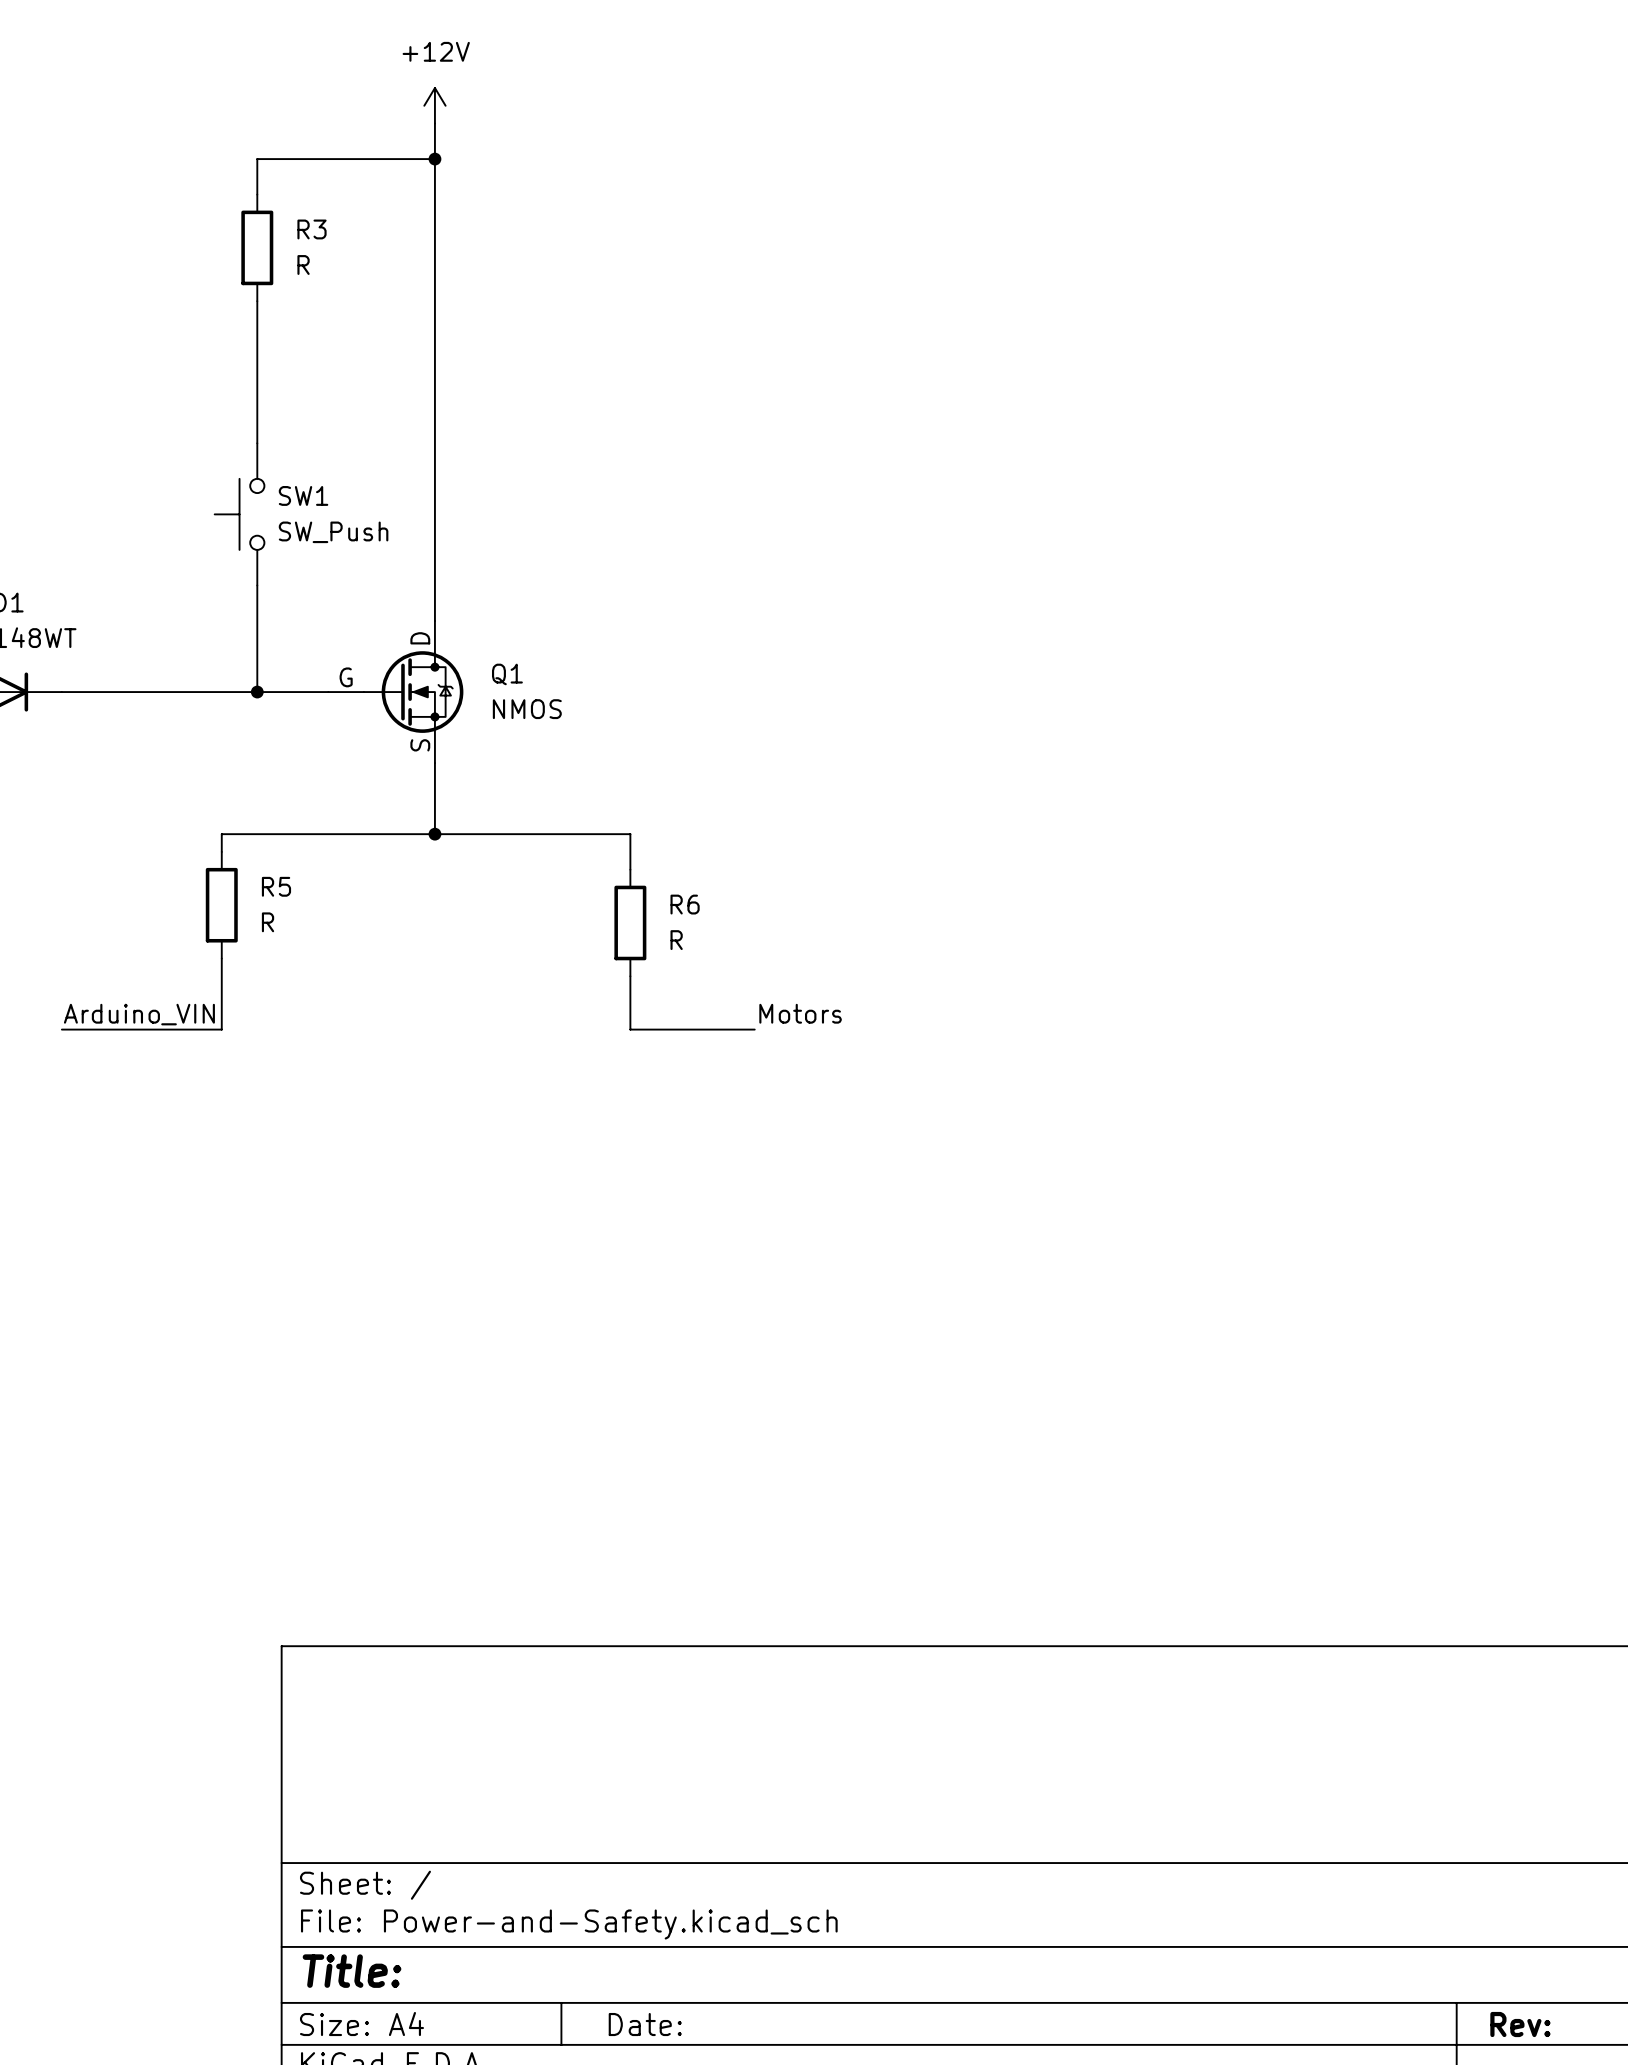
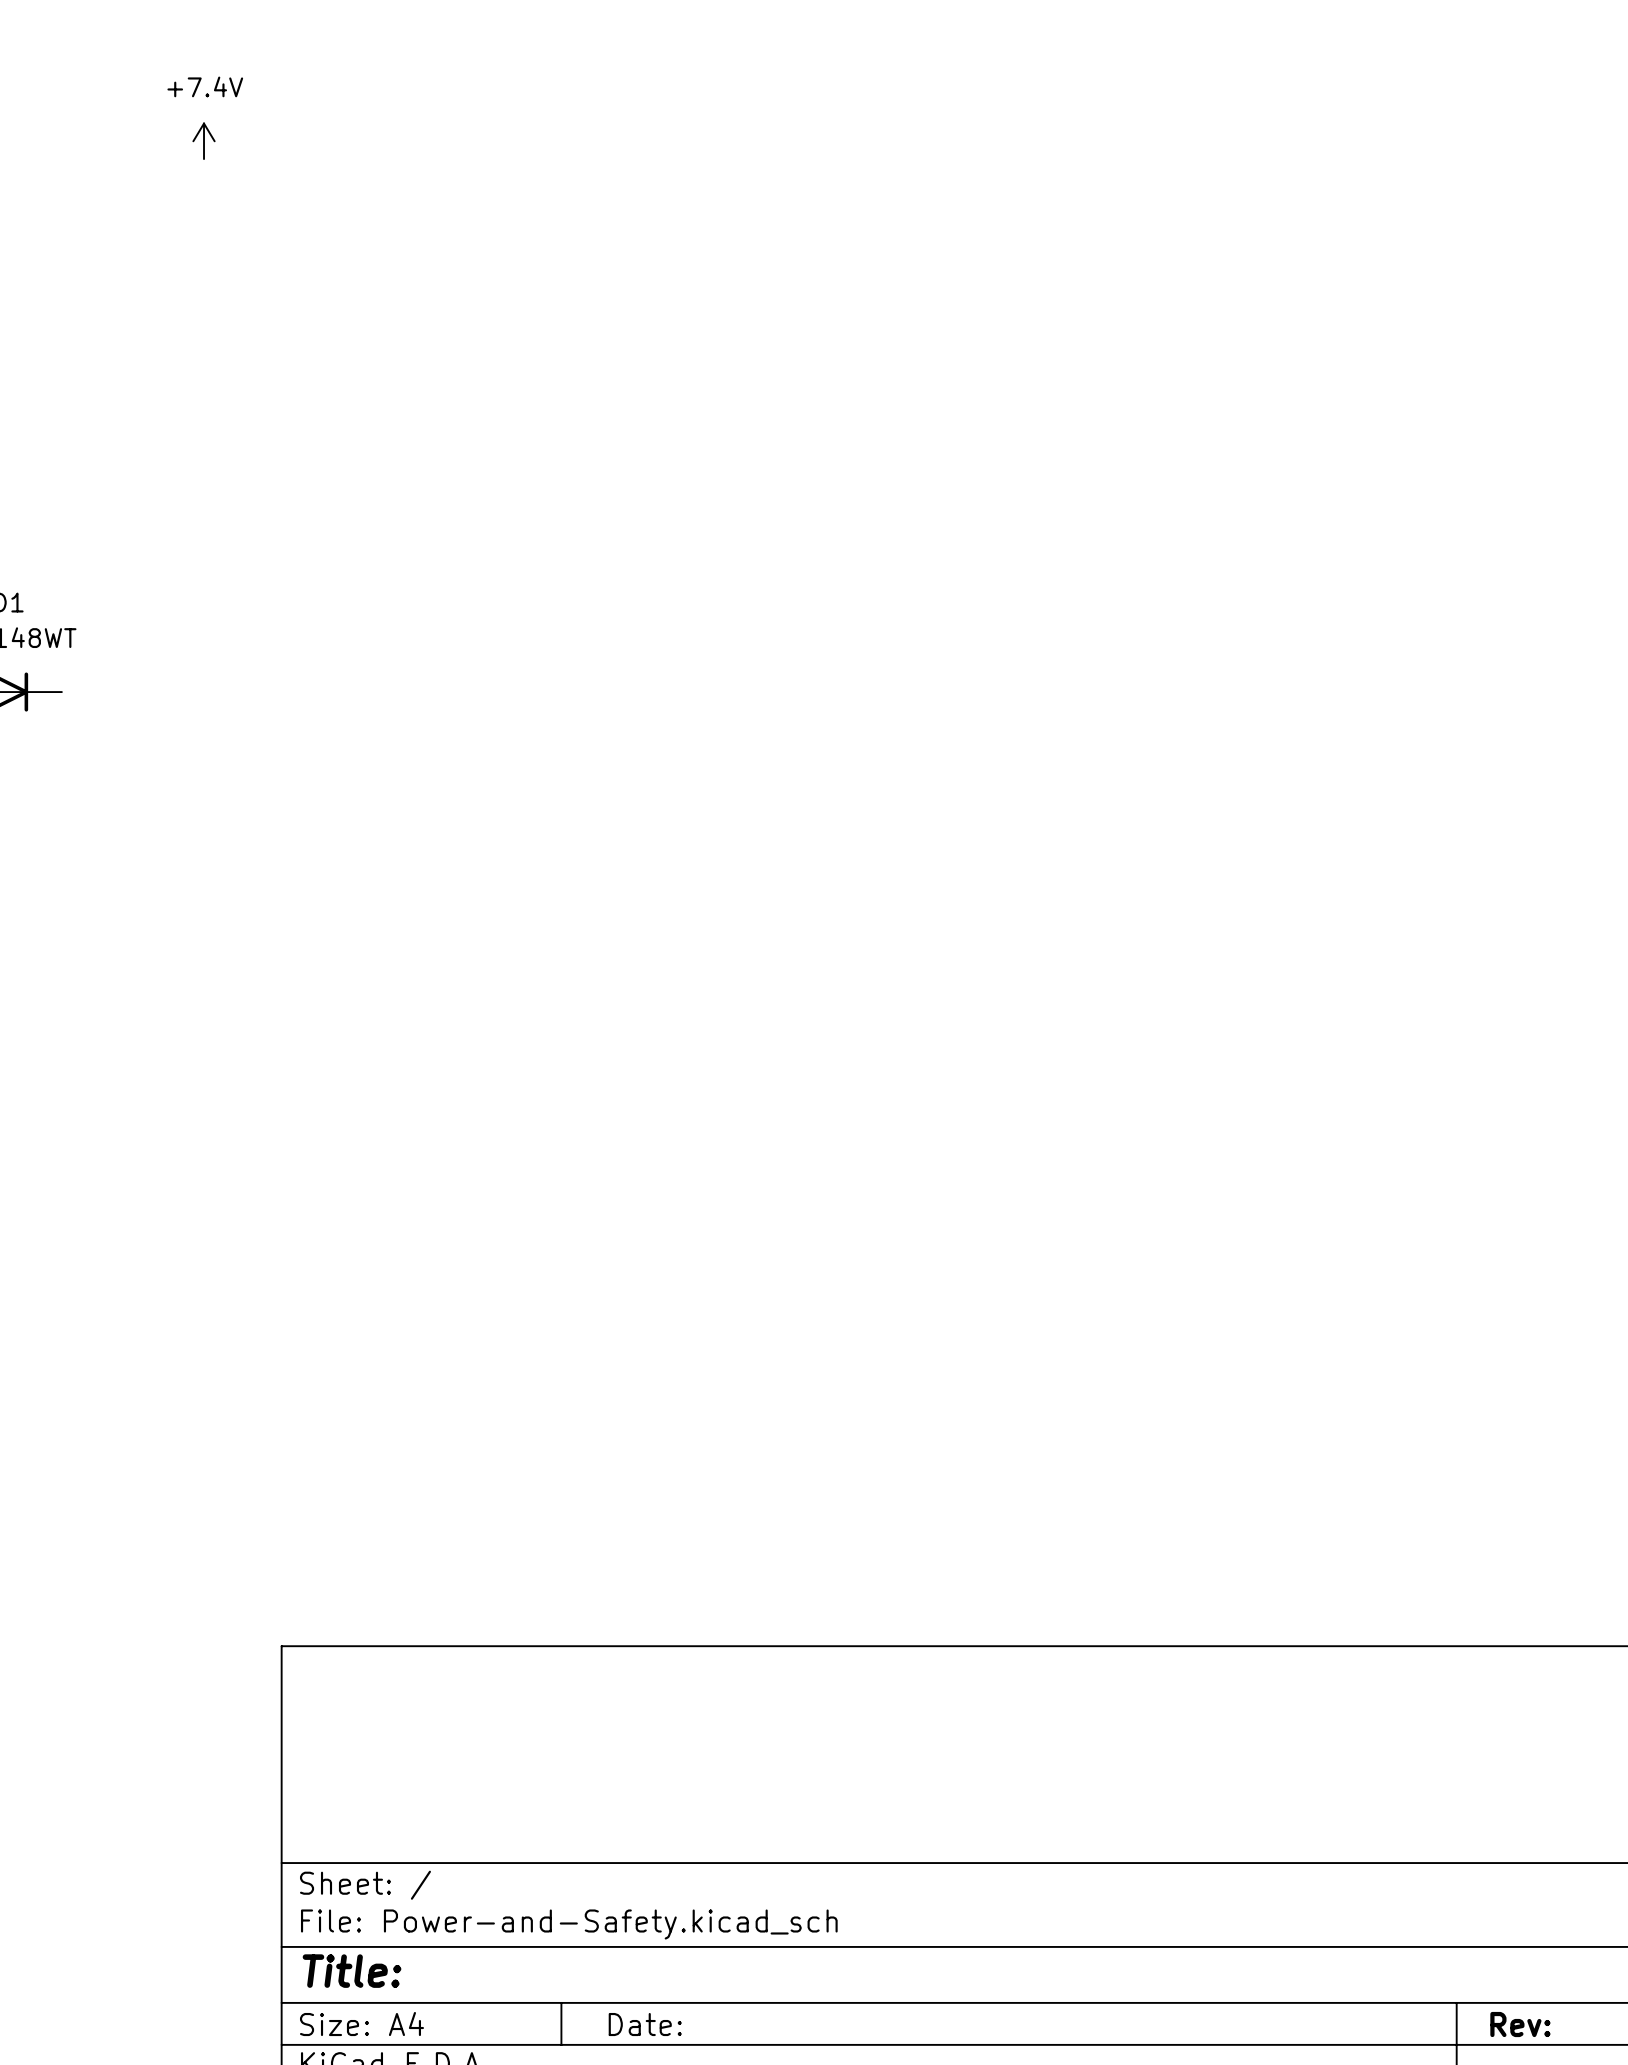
power symbol: +12V (434, 105) -> none
wire: (434, 123) (434, 620) -> none
power symbol: none -> +7.4V (204, 141)
wire: (434, 159) (257, 159) (257, 194) -> none
junction: (434, 159) -> none
R3: R (257, 247) -> none
wire: (257, 301) (257, 443) -> none
SW1: SW_Push (239, 514) -> none
wire: (257, 585) (257, 692) -> none
wire: (61, 692) (328, 692) -> none
junction: (257, 692) -> none
Q1: NMOS (395, 692) -> none
wire: (434, 763) (434, 834) -> none
junction: (434, 834) -> none
wire: (221, 851) (221, 834) (630, 834) (630, 869) -> none
R5: R (221, 905) -> none
R6: R (630, 922) -> none
wire: (221, 958) (221, 1029) (61, 1029) -> none
wire: (630, 976) (630, 1029) (754, 1029) -> none
label: Motors (800, 1013) -> none
label: Arduino_VIN (139, 1014) -> none

